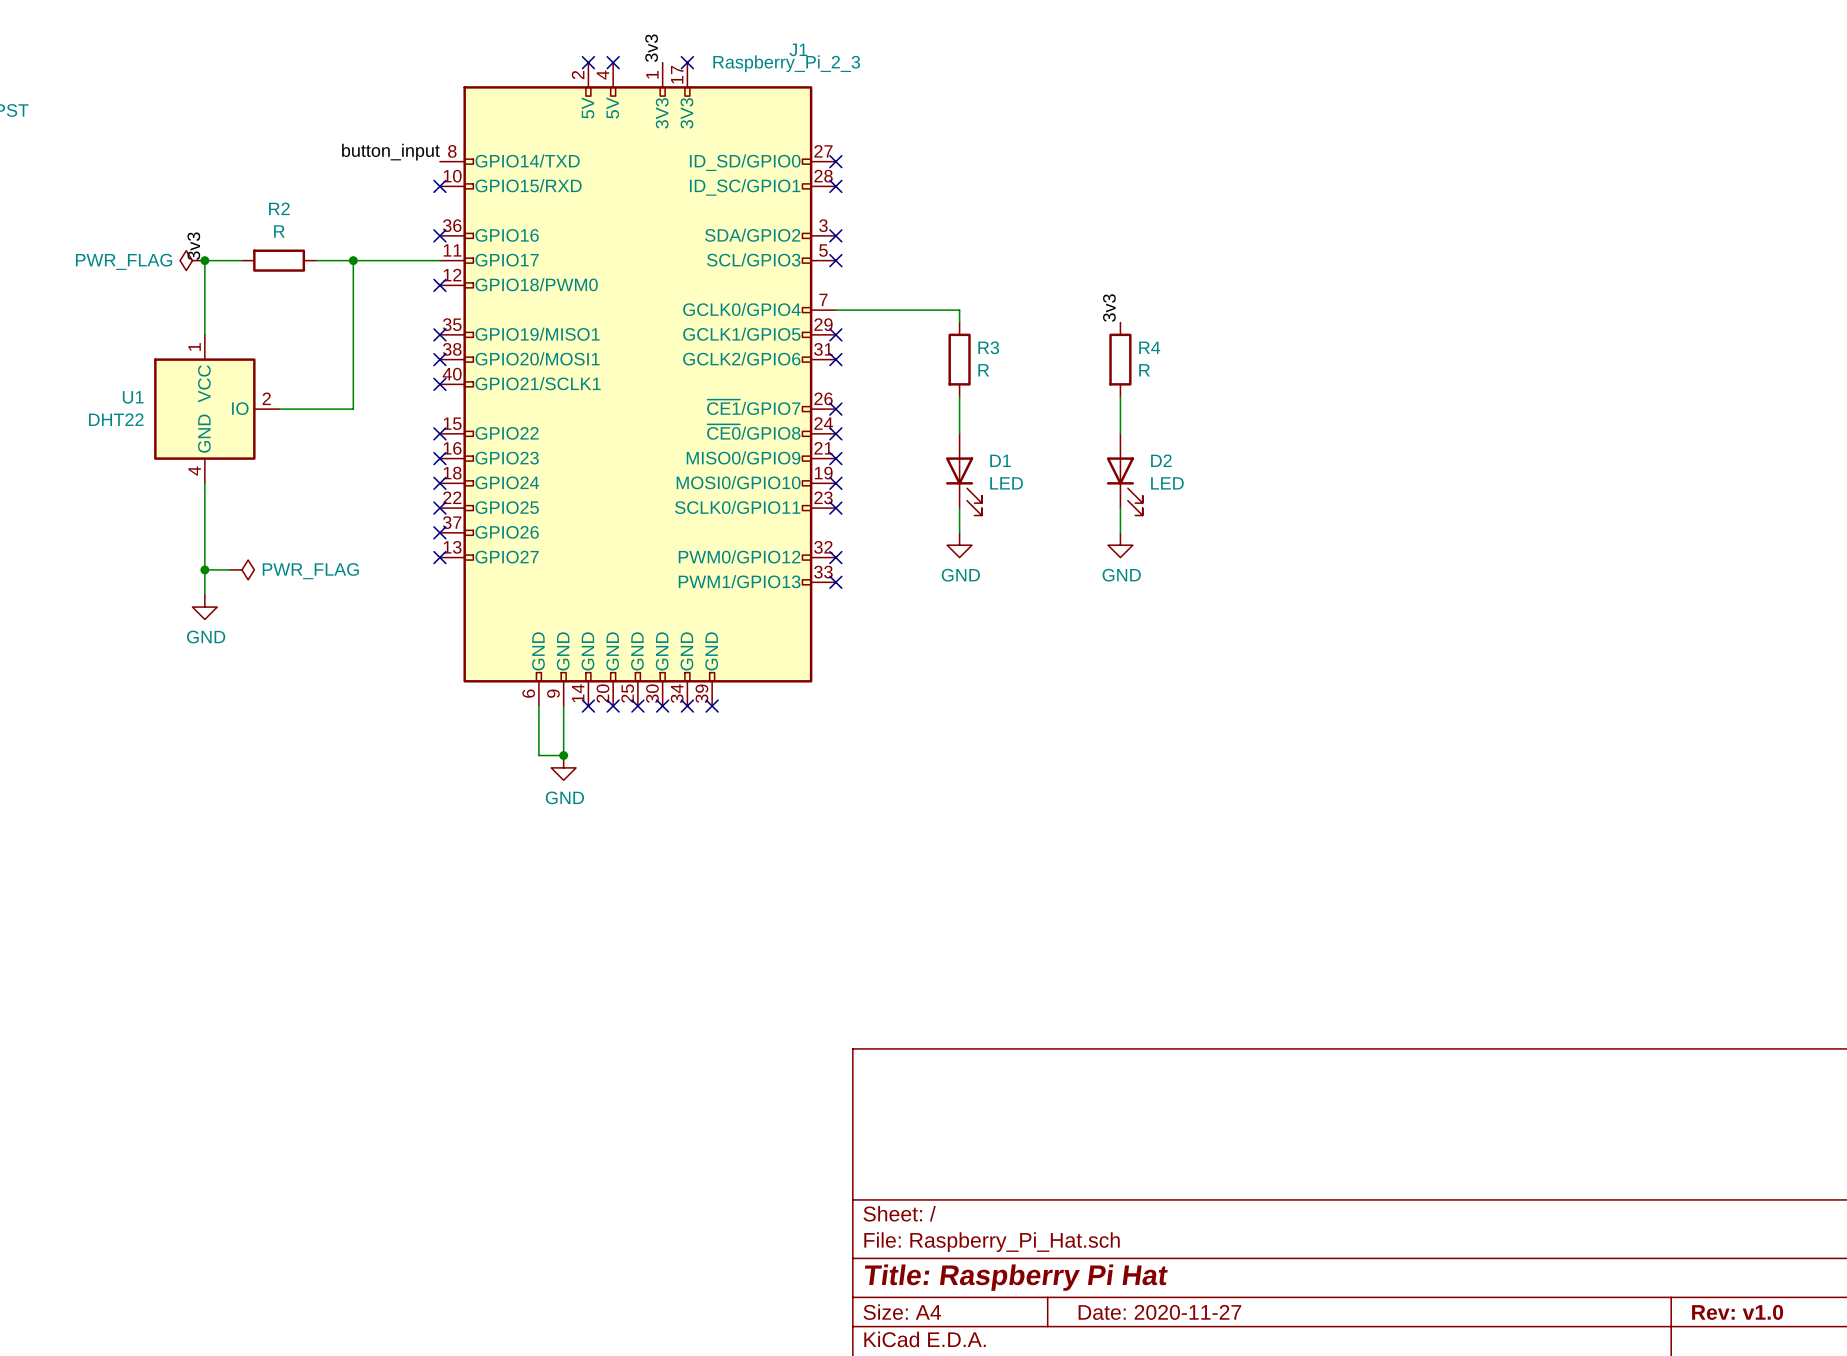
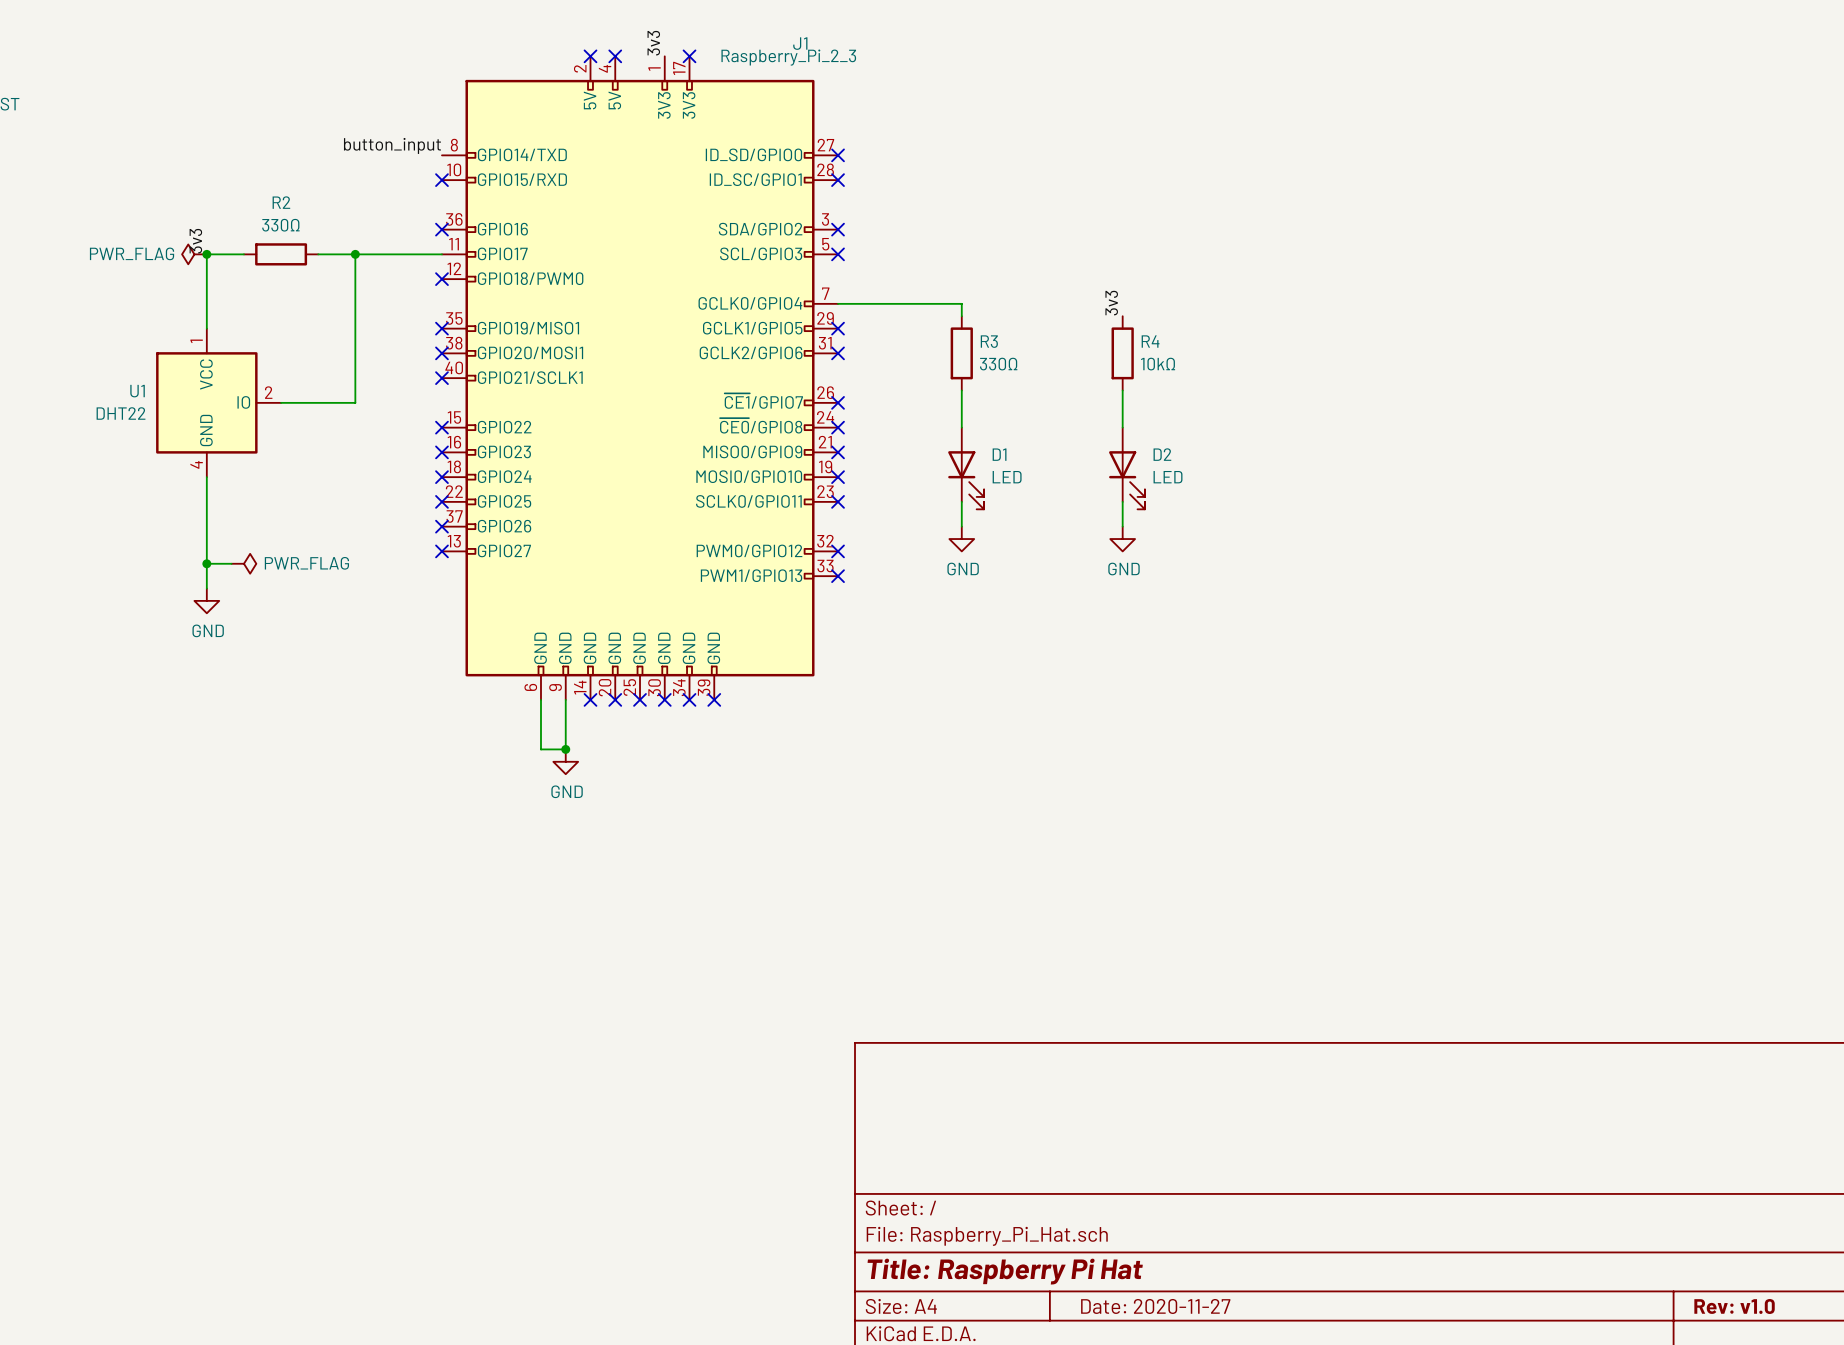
R2 value: R (279, 231) -> 330Ω (280, 225)
R3 value: R (983, 370) -> 330Ω (998, 364)
R4 value: R (1144, 370) -> 10kΩ (1158, 364)

